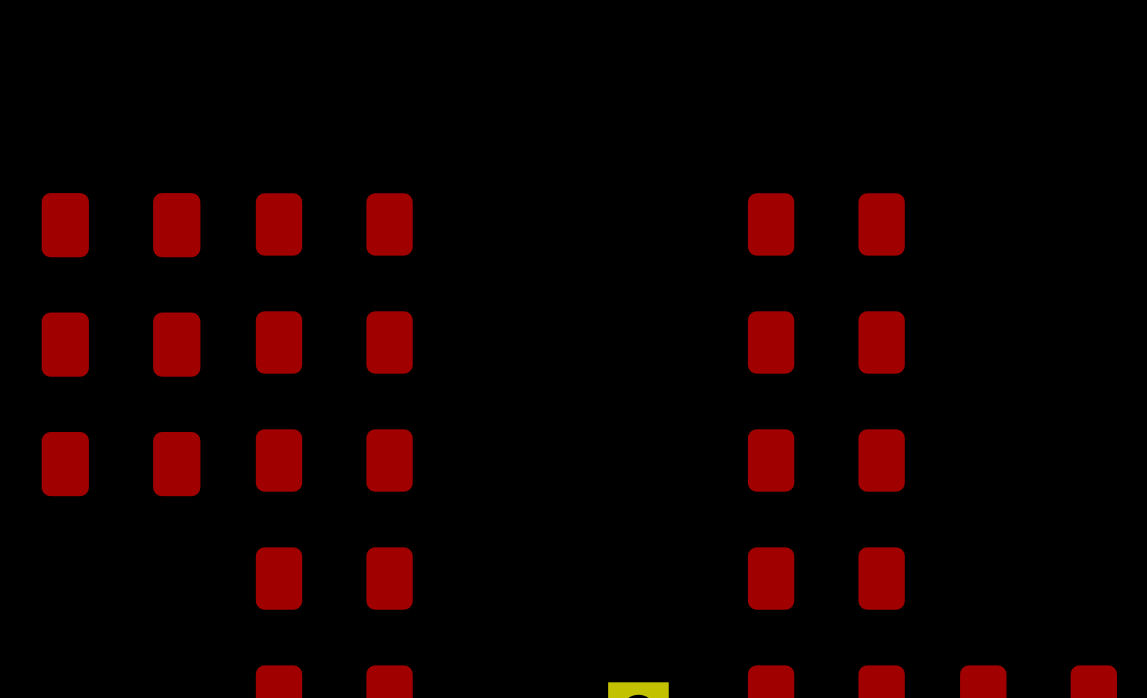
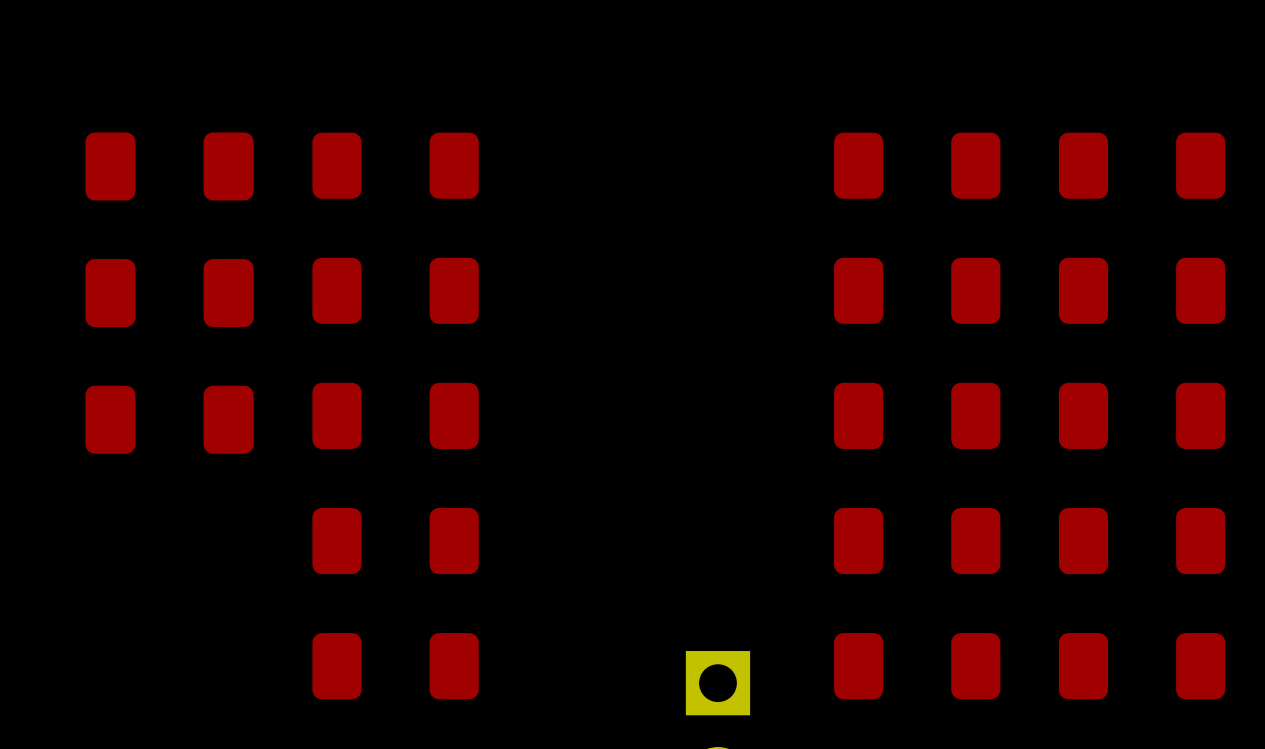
part: none -> (1142, 165)
part: none -> (1142, 290)
part: none -> (1142, 415)
part: none -> (1142, 541)

